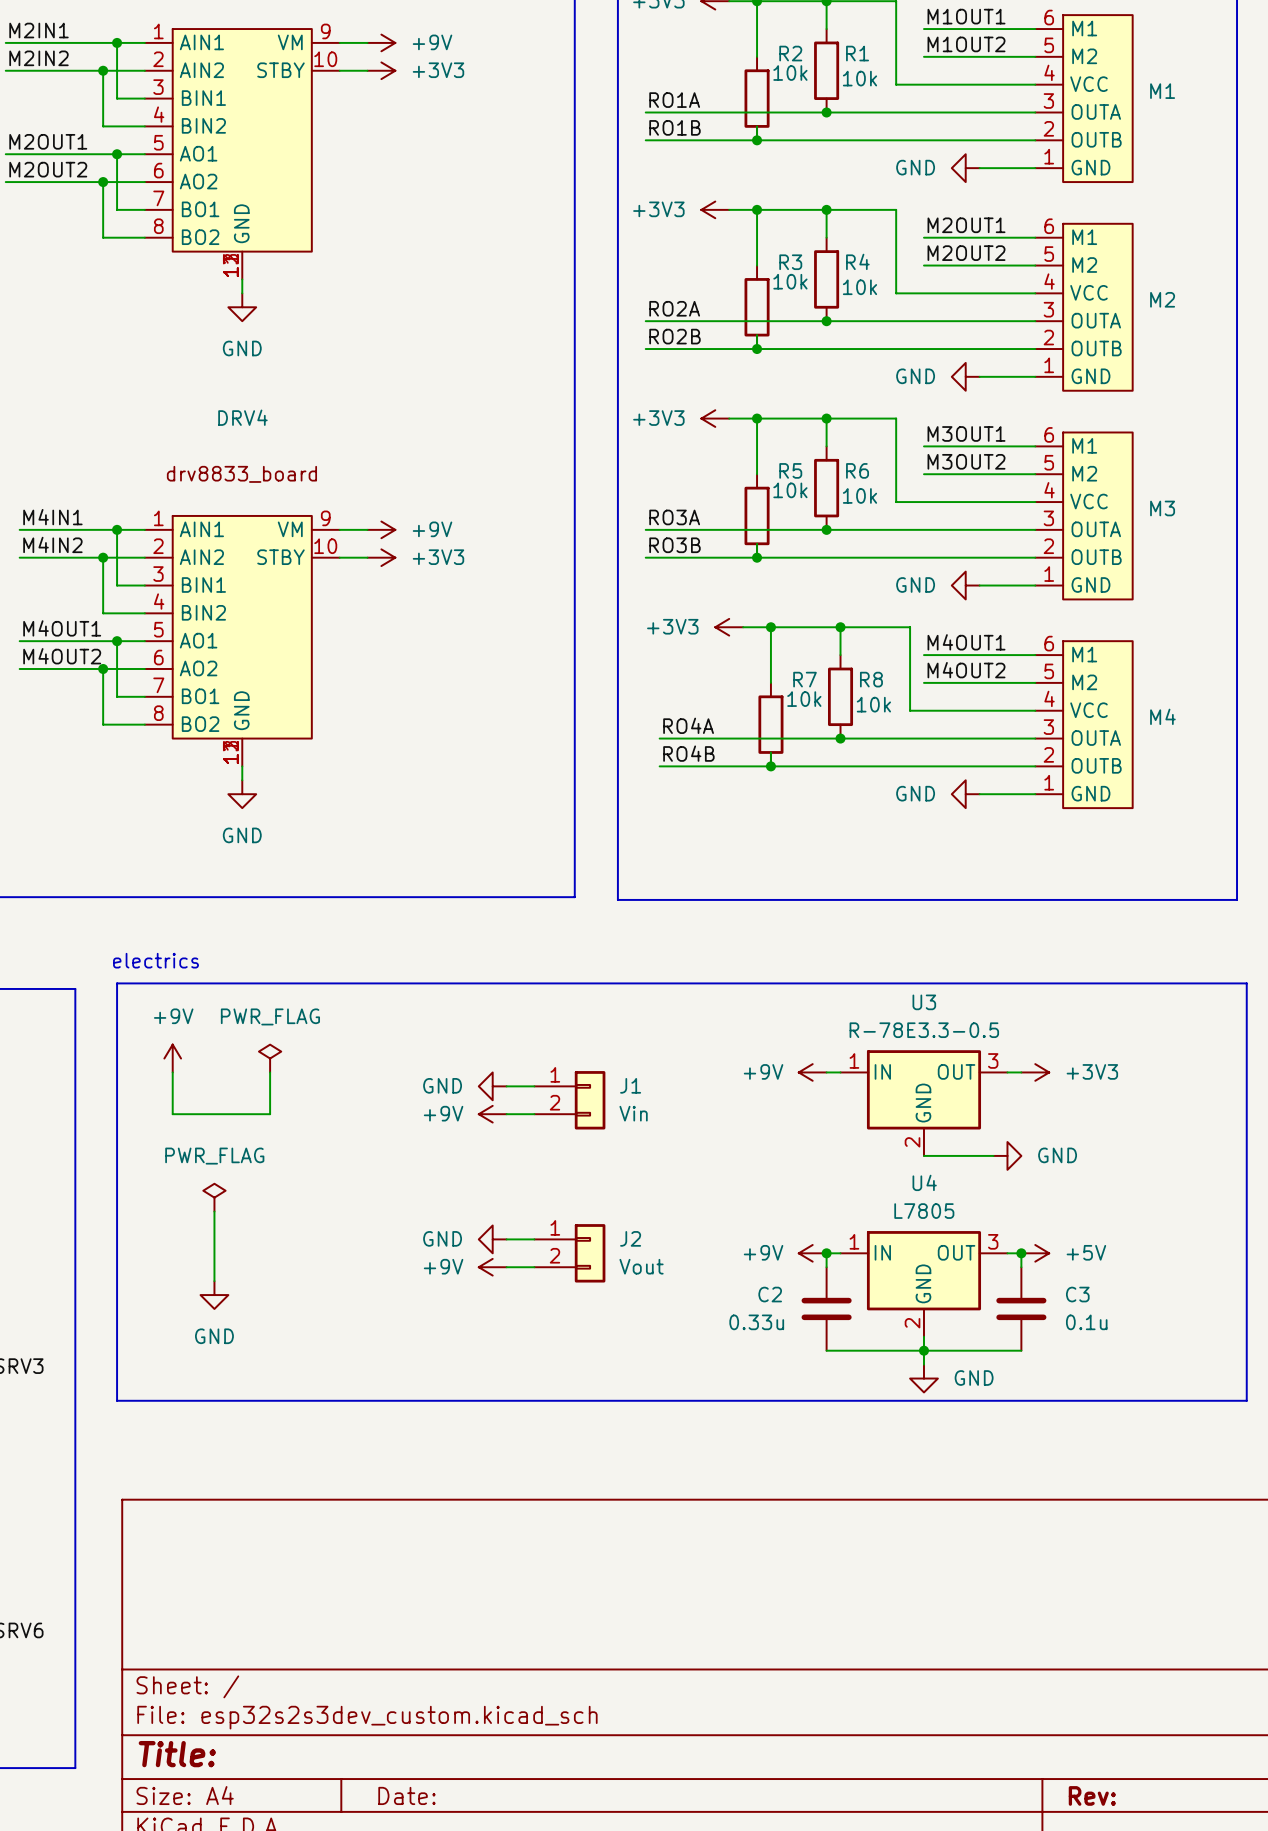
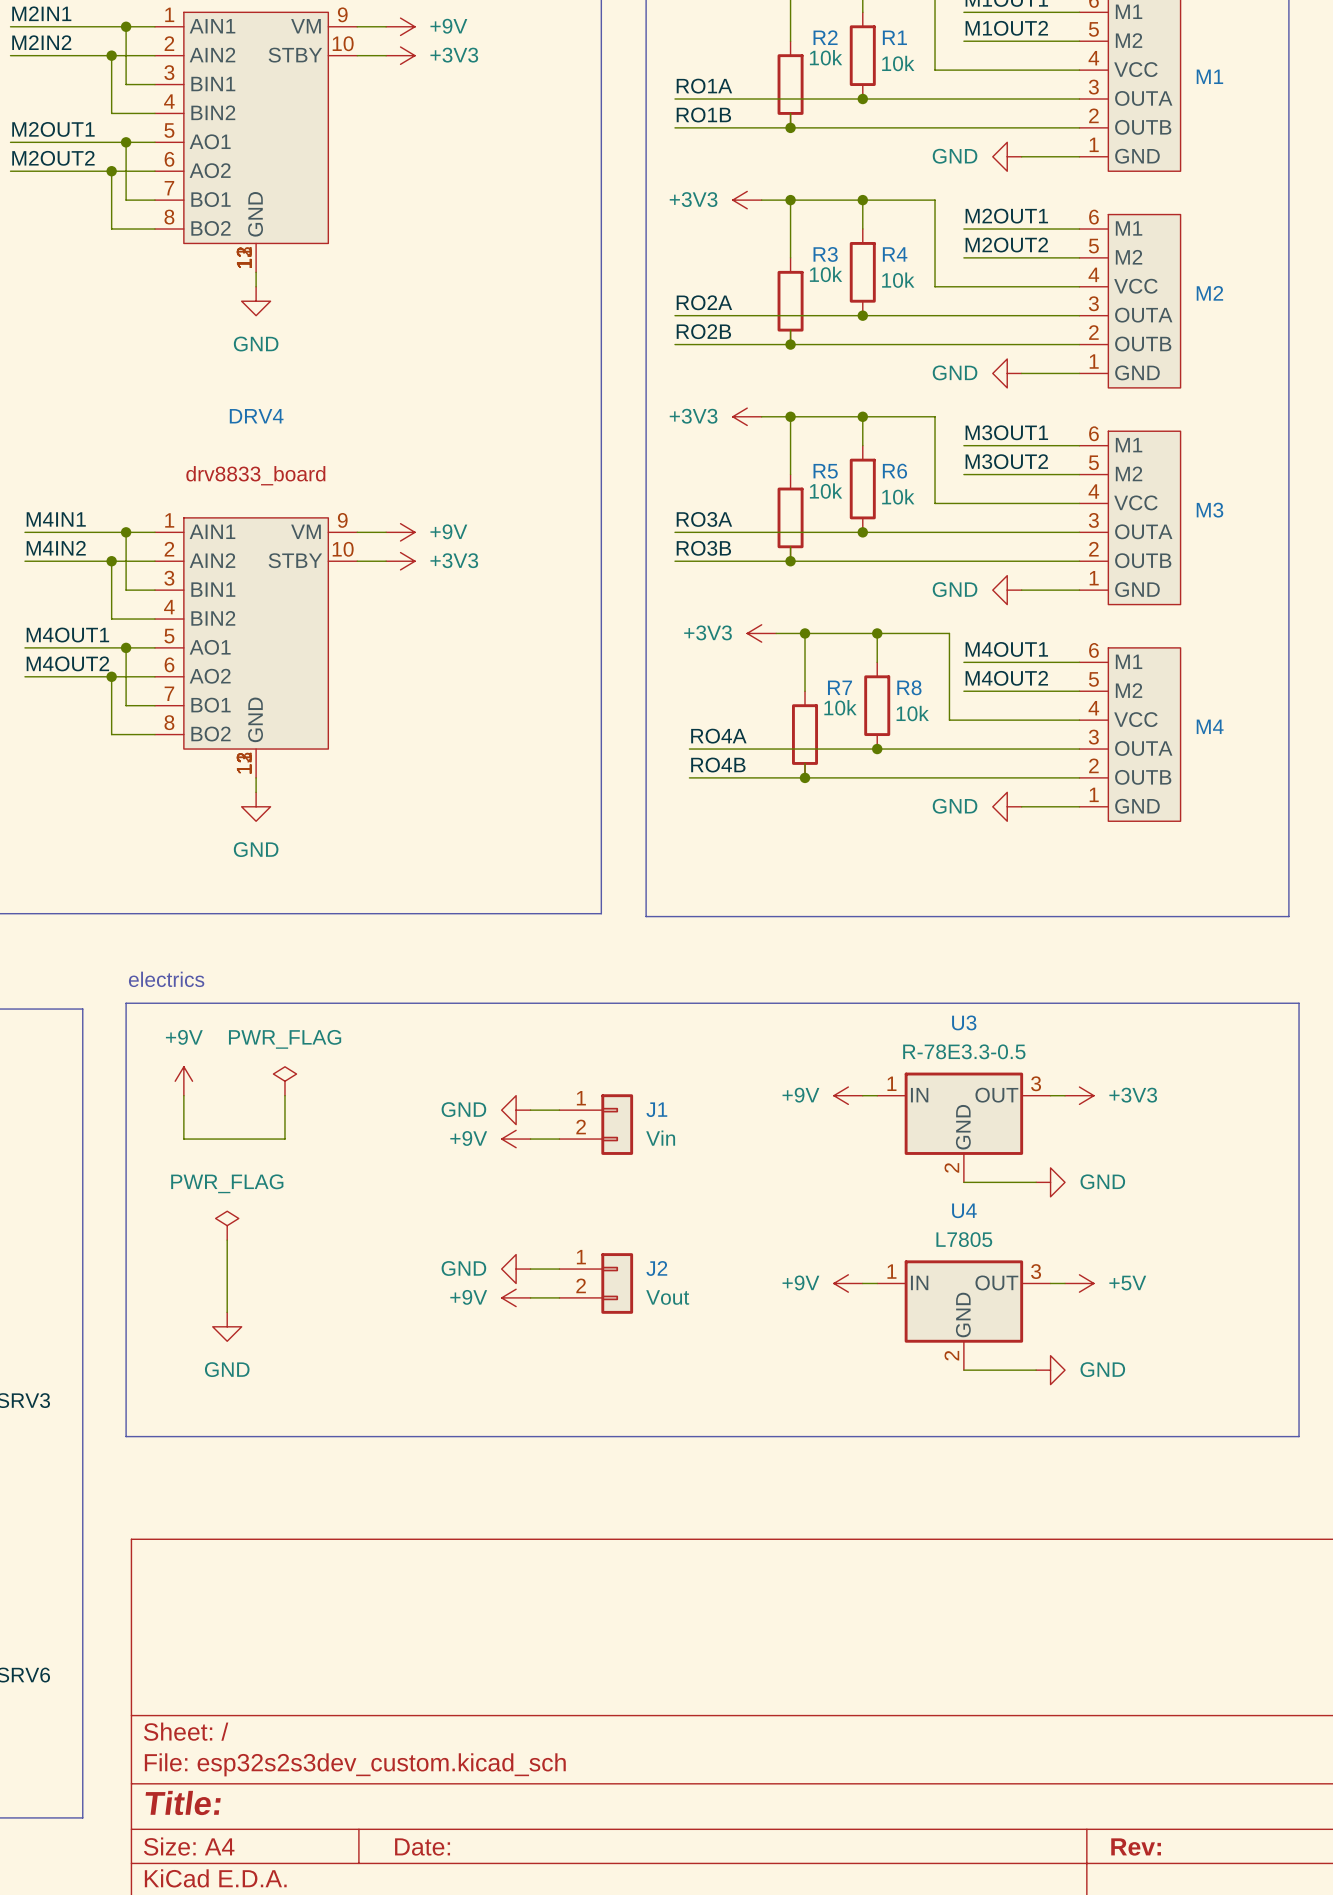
wire: (826, 1253) (826, 1267) -> none
junction: (826, 1253) -> none
wire: (1021, 1253) (1021, 1267) -> none
junction: (1021, 1253) -> none
C2: 0.33u (826, 1308) -> none
C3: 0.1u (1021, 1308) -> none
wire: (923, 1336) (923, 1364) -> (963, 1370) (1036, 1370)
wire: (826, 1350) (1021, 1350) -> none
junction: (923, 1350) -> none
power symbol rotation: 0° (923, 1378) -> 90° counterclockwise (1050, 1370)
power symbol position: GND (923, 1378) -> GND (1050, 1370)

